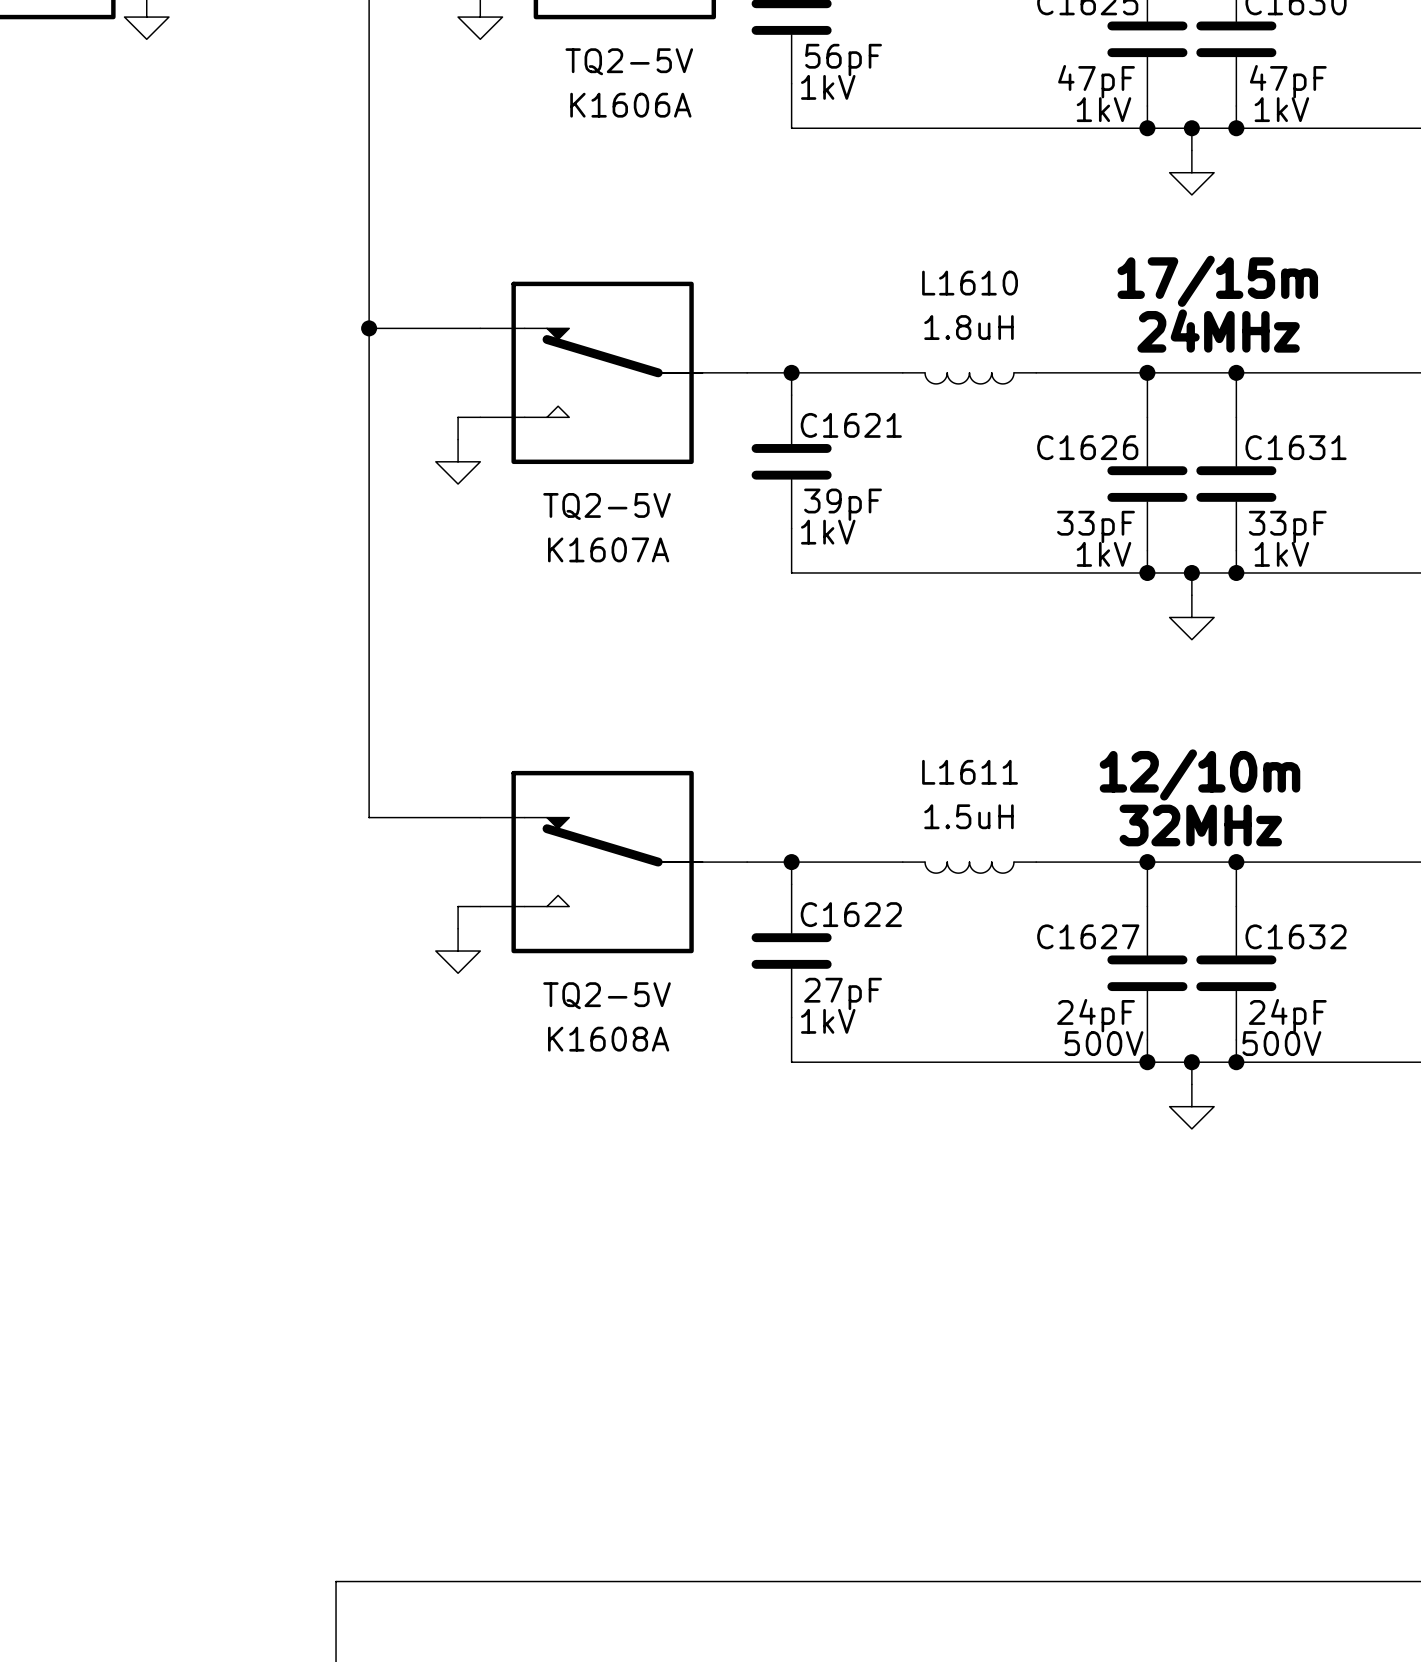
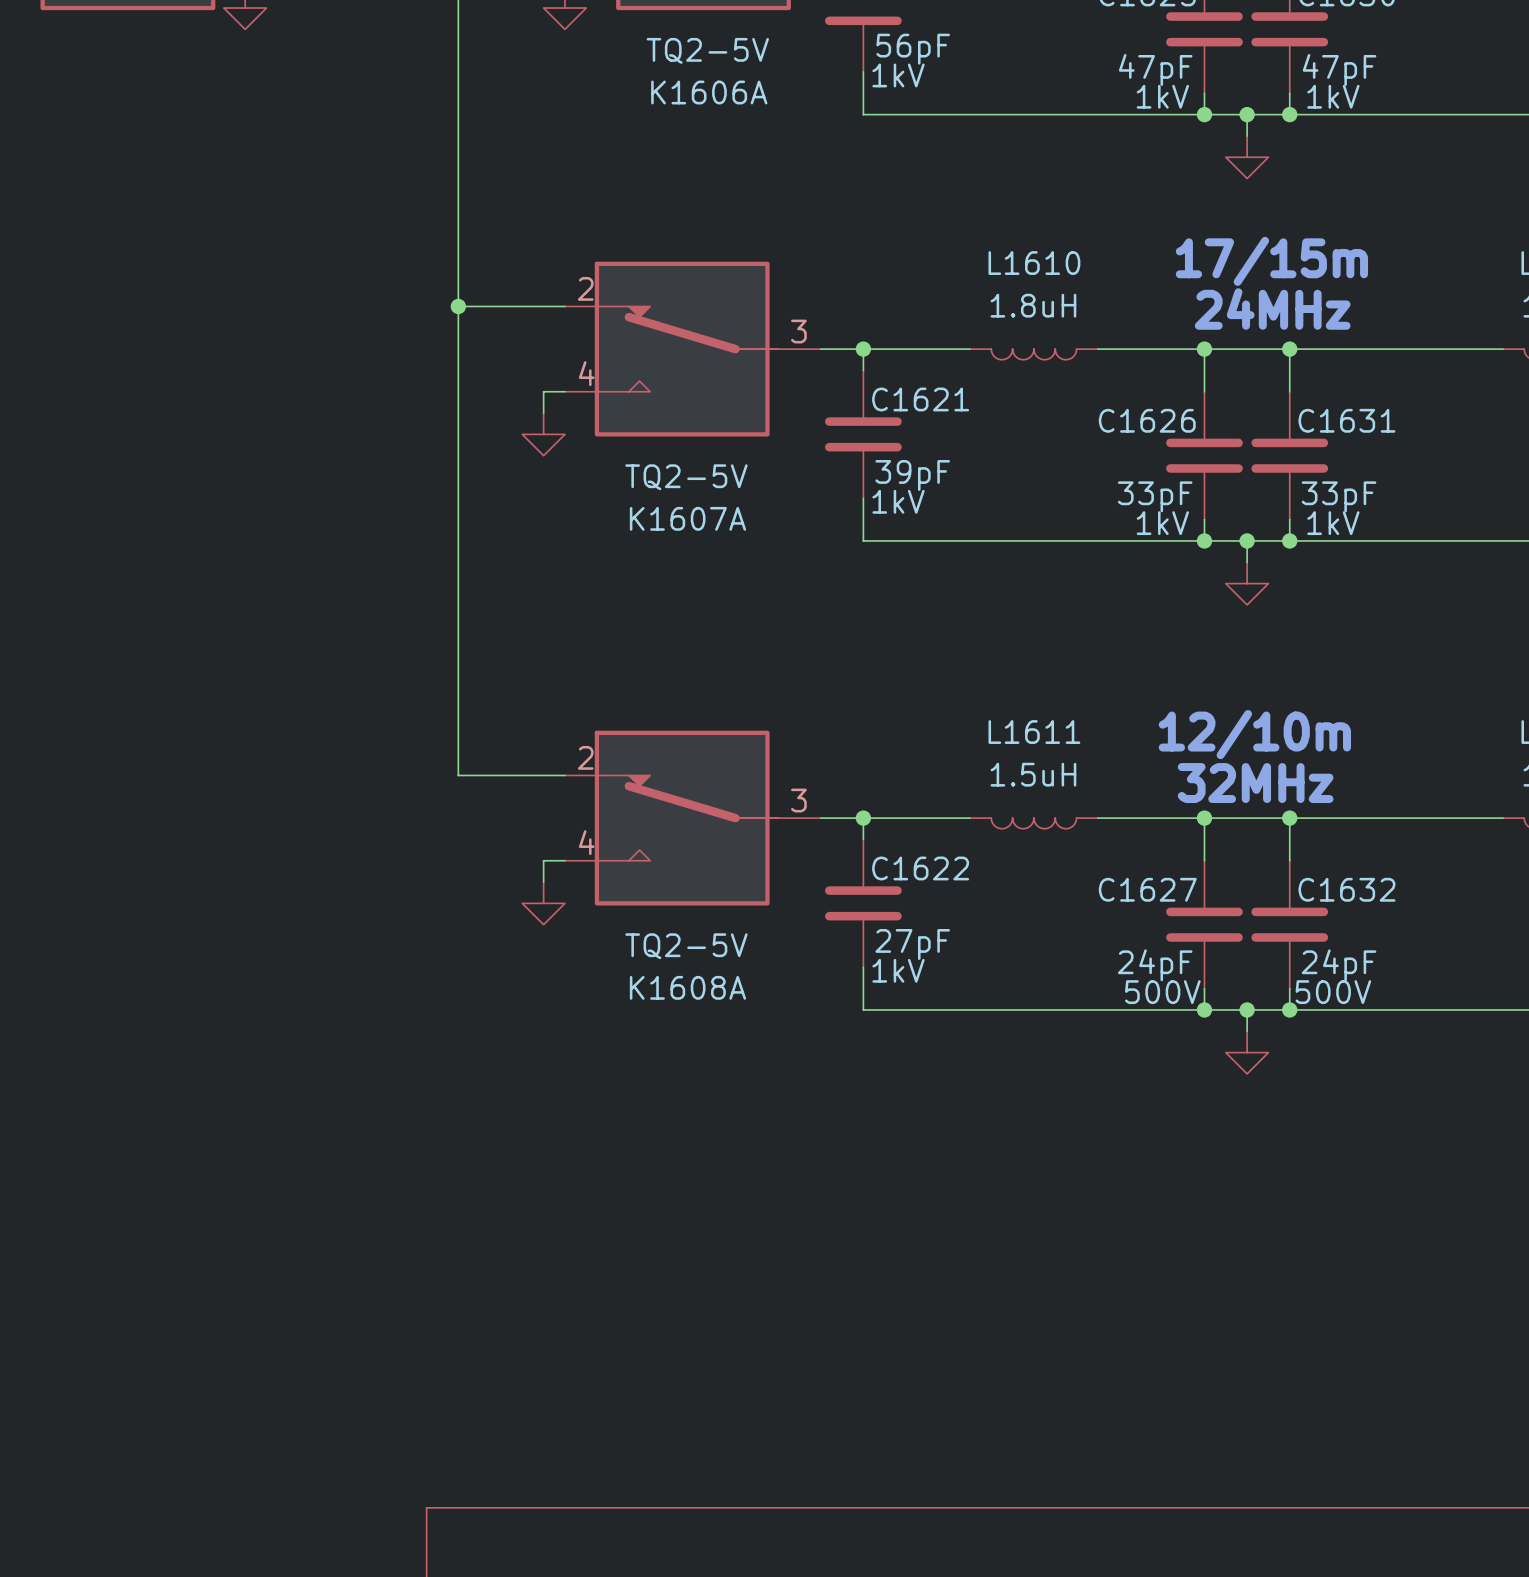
K1607A pin number: none -> 2 (585, 288)
K1607A pin number: none -> 3 (798, 331)
K1607A pin number: none -> 4 (586, 373)
K1608A pin number: none -> 2 (585, 757)
K1608A pin number: none -> 3 (798, 800)
K1608A pin number: none -> 4 (586, 842)

